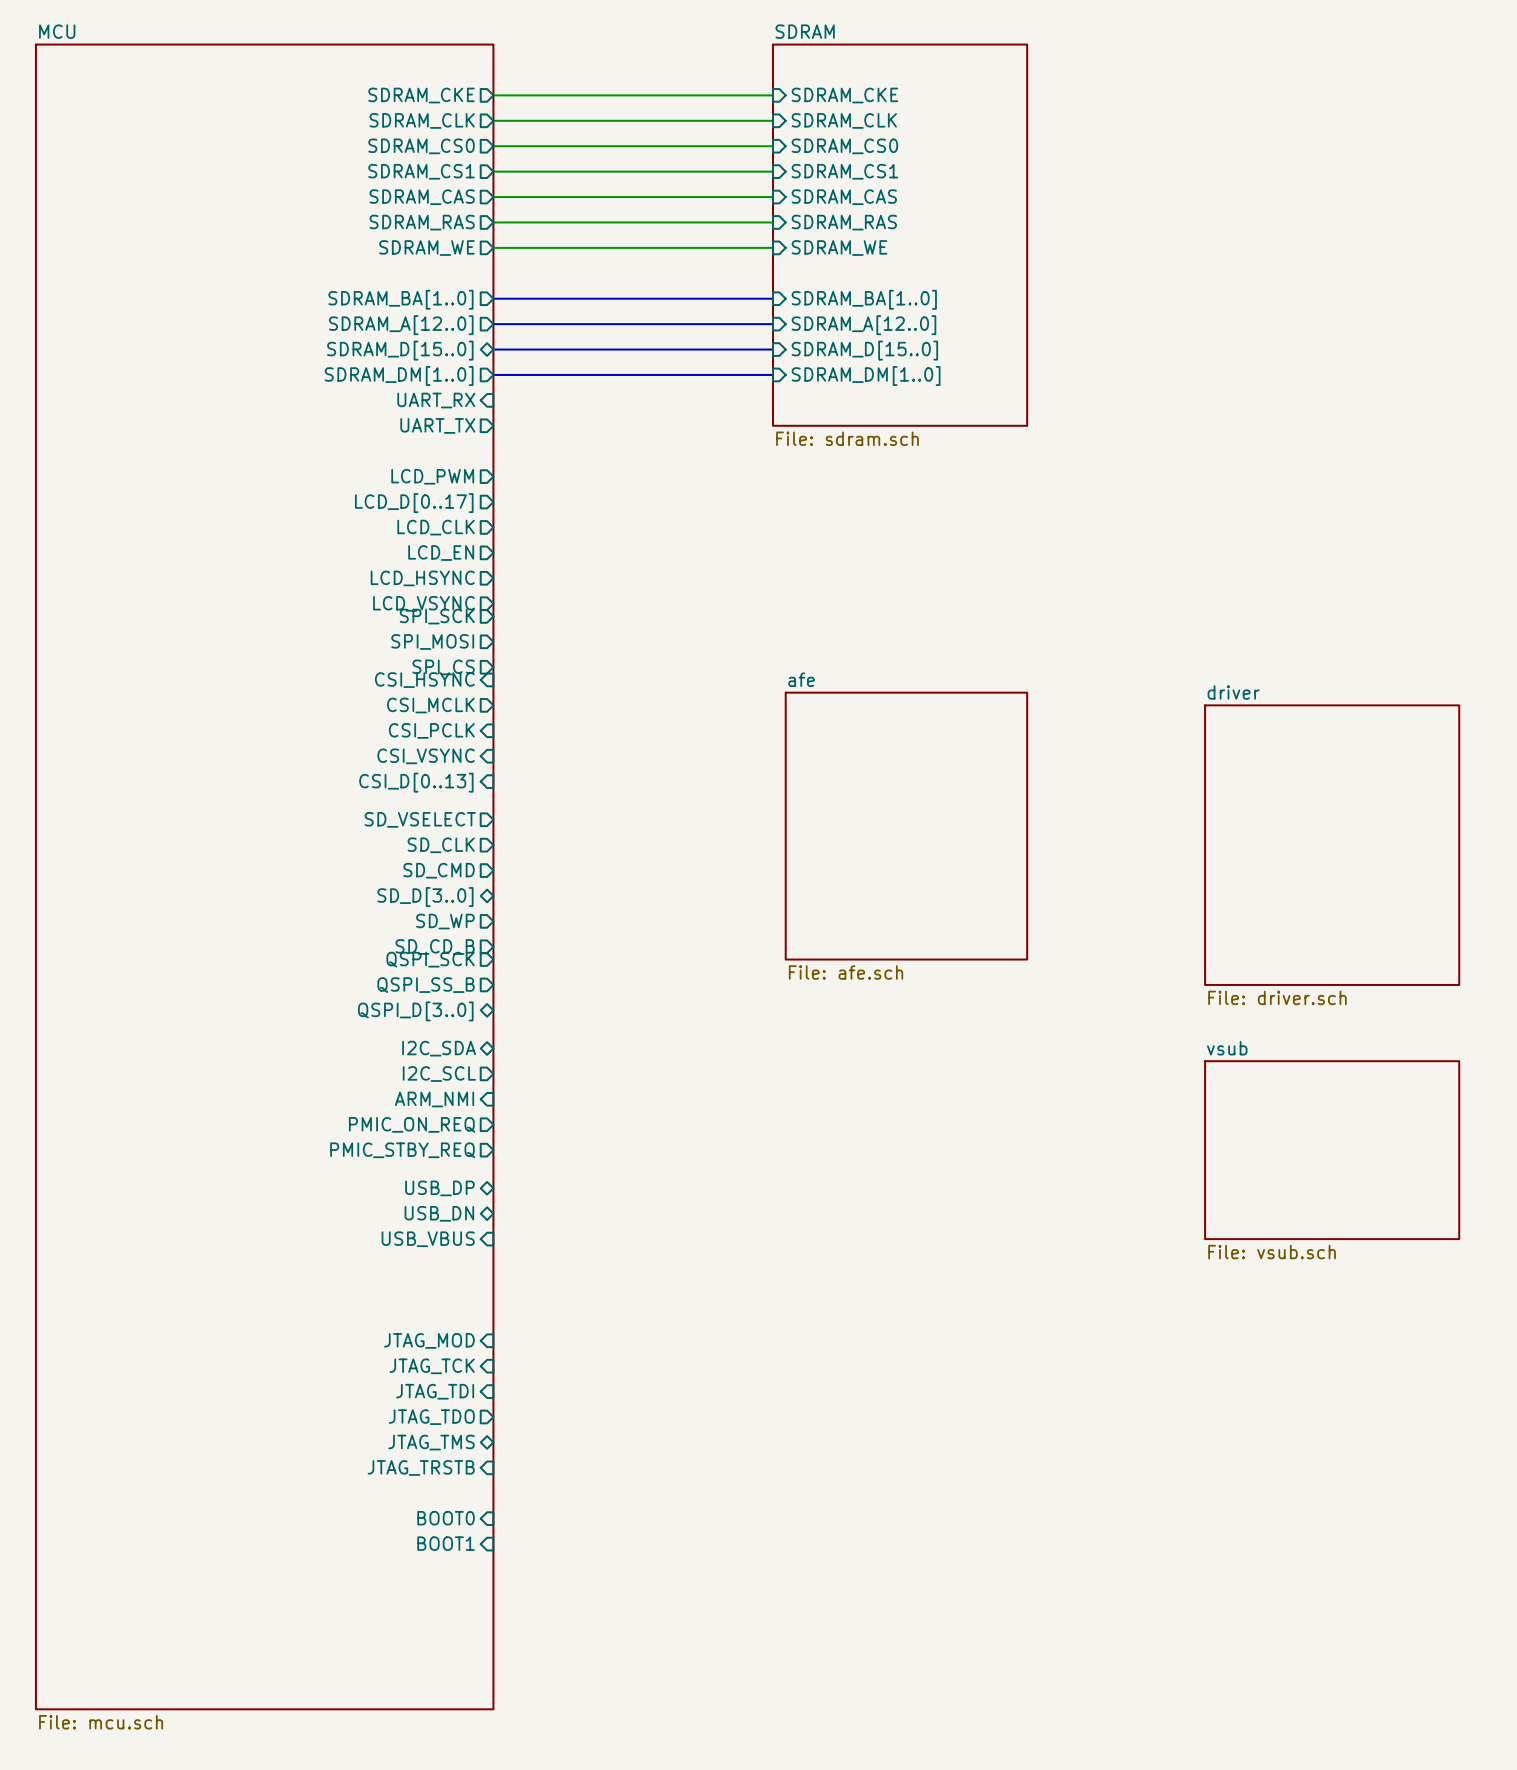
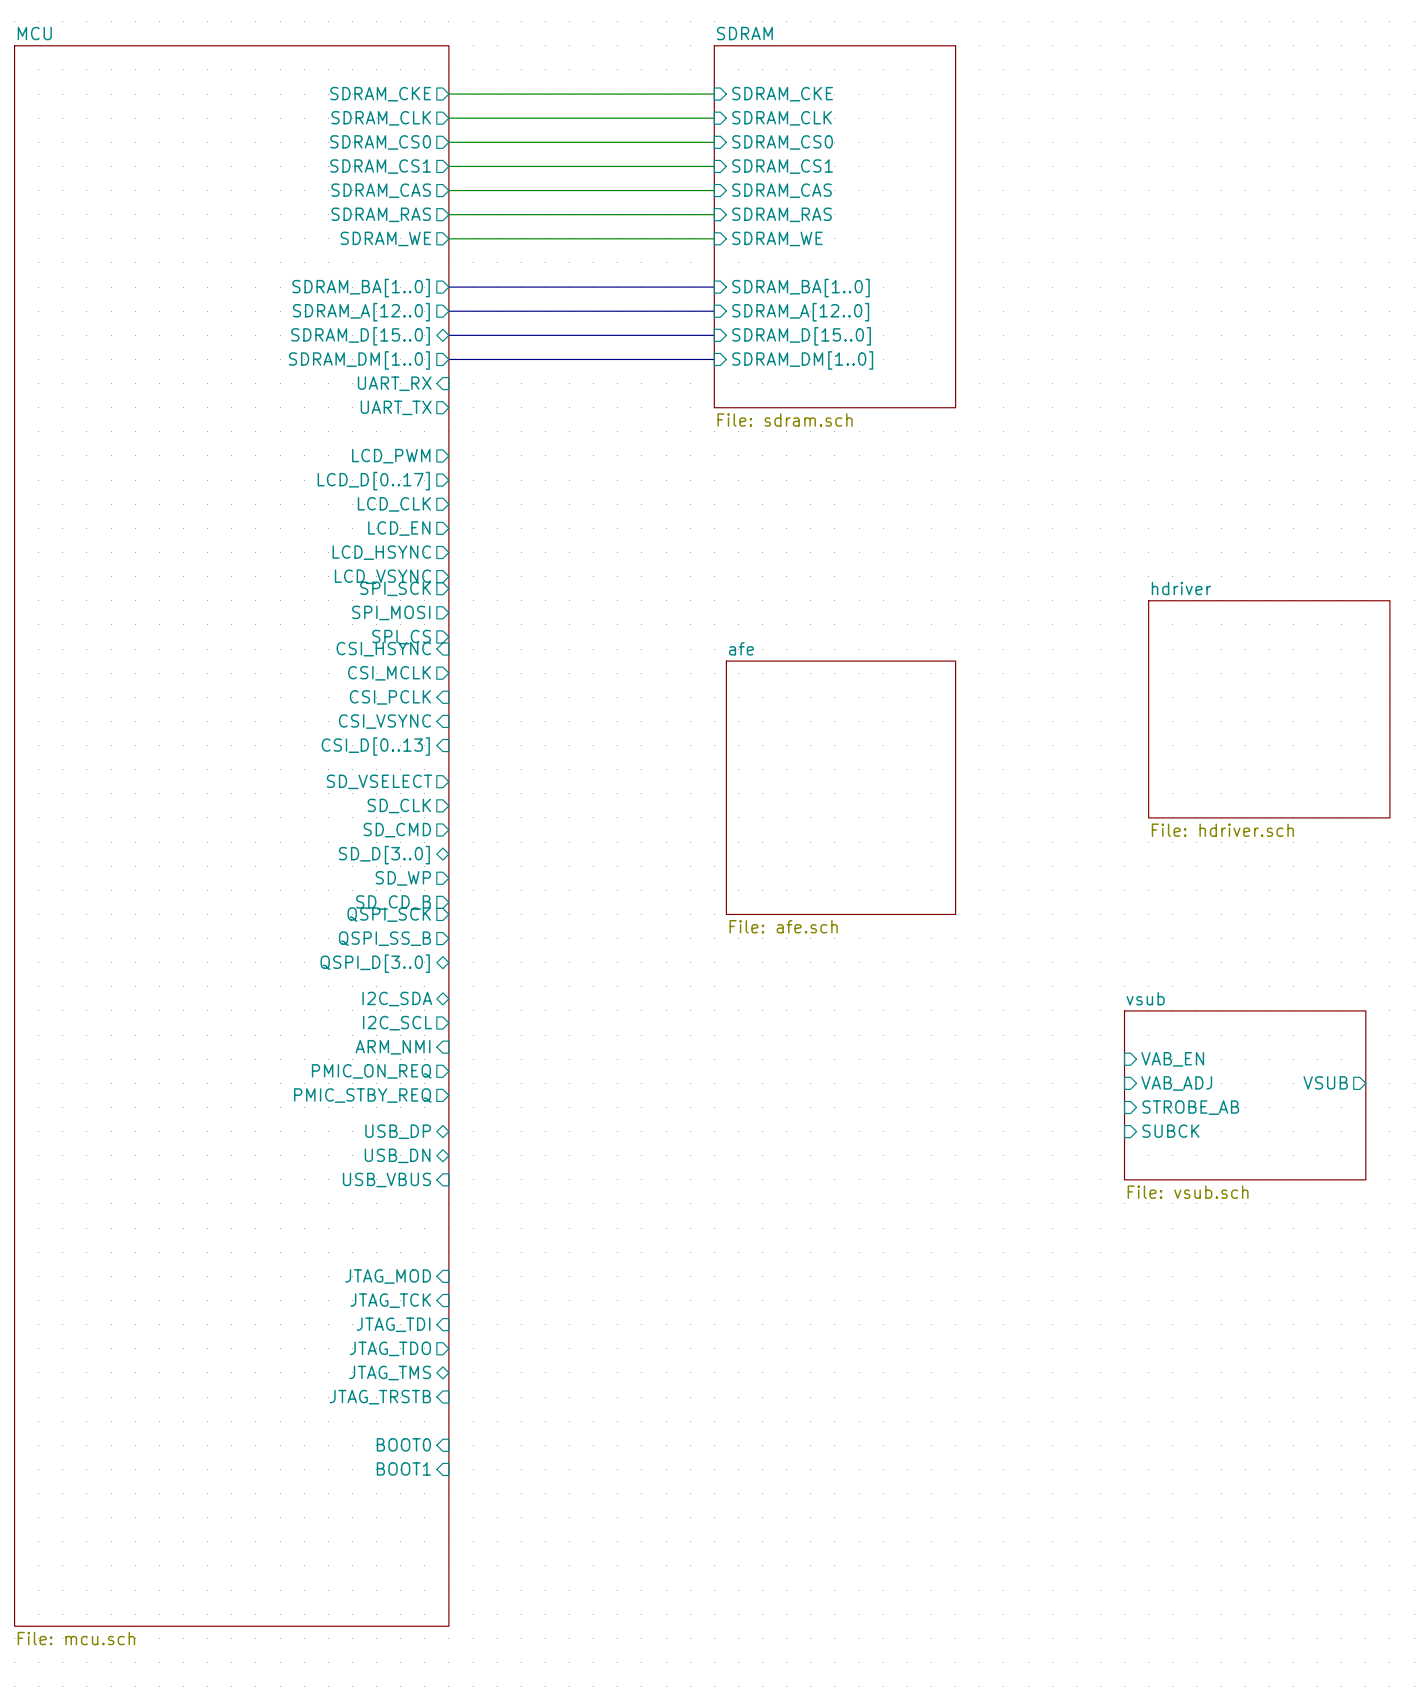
sheet hdriver: none -> File: hdriver.sch (1269, 709)
sheet driver: File: driver.sch (1332, 845) -> none
sheet pin: none -> VAB_EN (1172, 1059)
sheet pin: none -> VSUB (1325, 1082)
sheet pin: none -> VAB_ADJ (1176, 1083)
sheet pin: none -> STROBE_AB (1190, 1107)
sheet pin: none -> SUBCK (1170, 1131)

